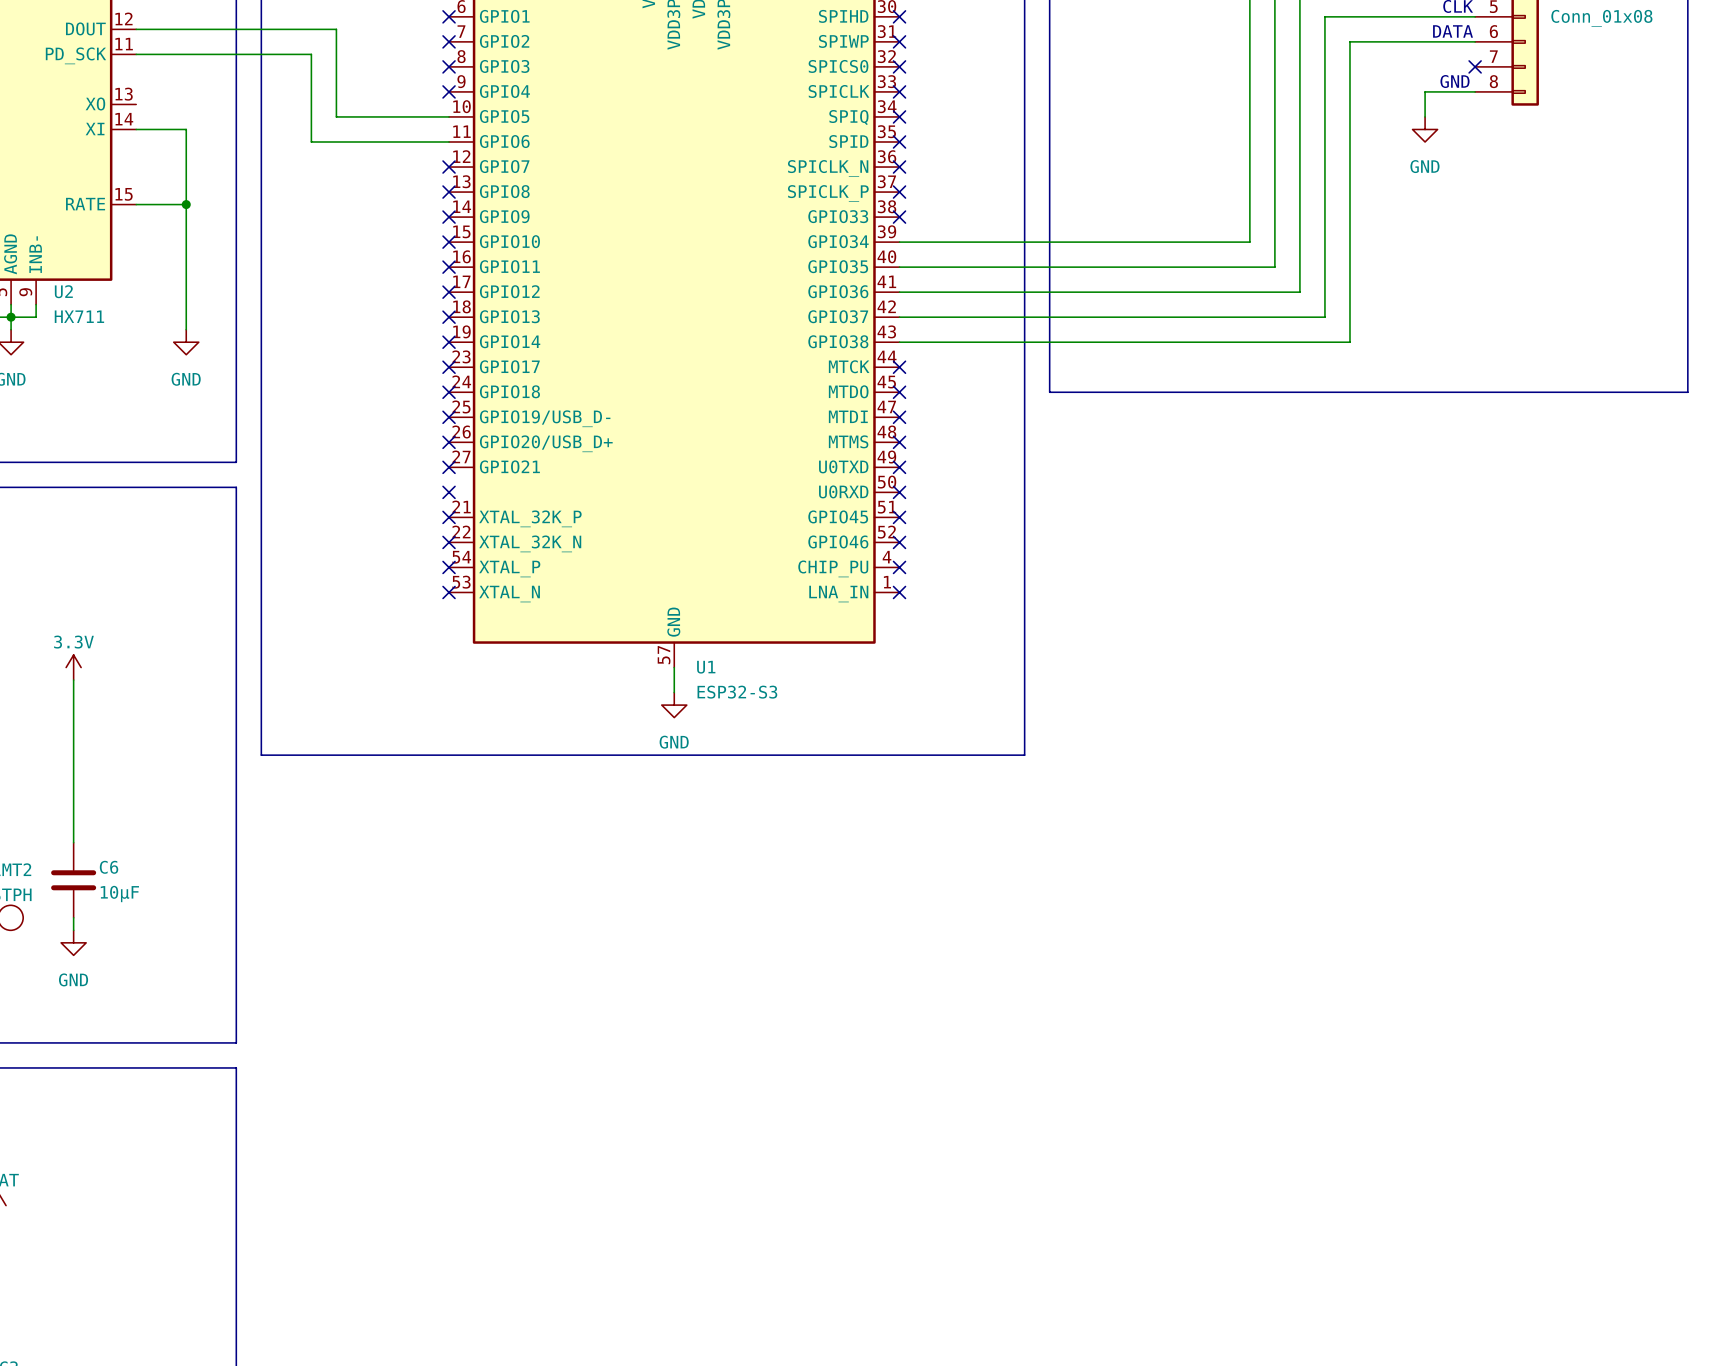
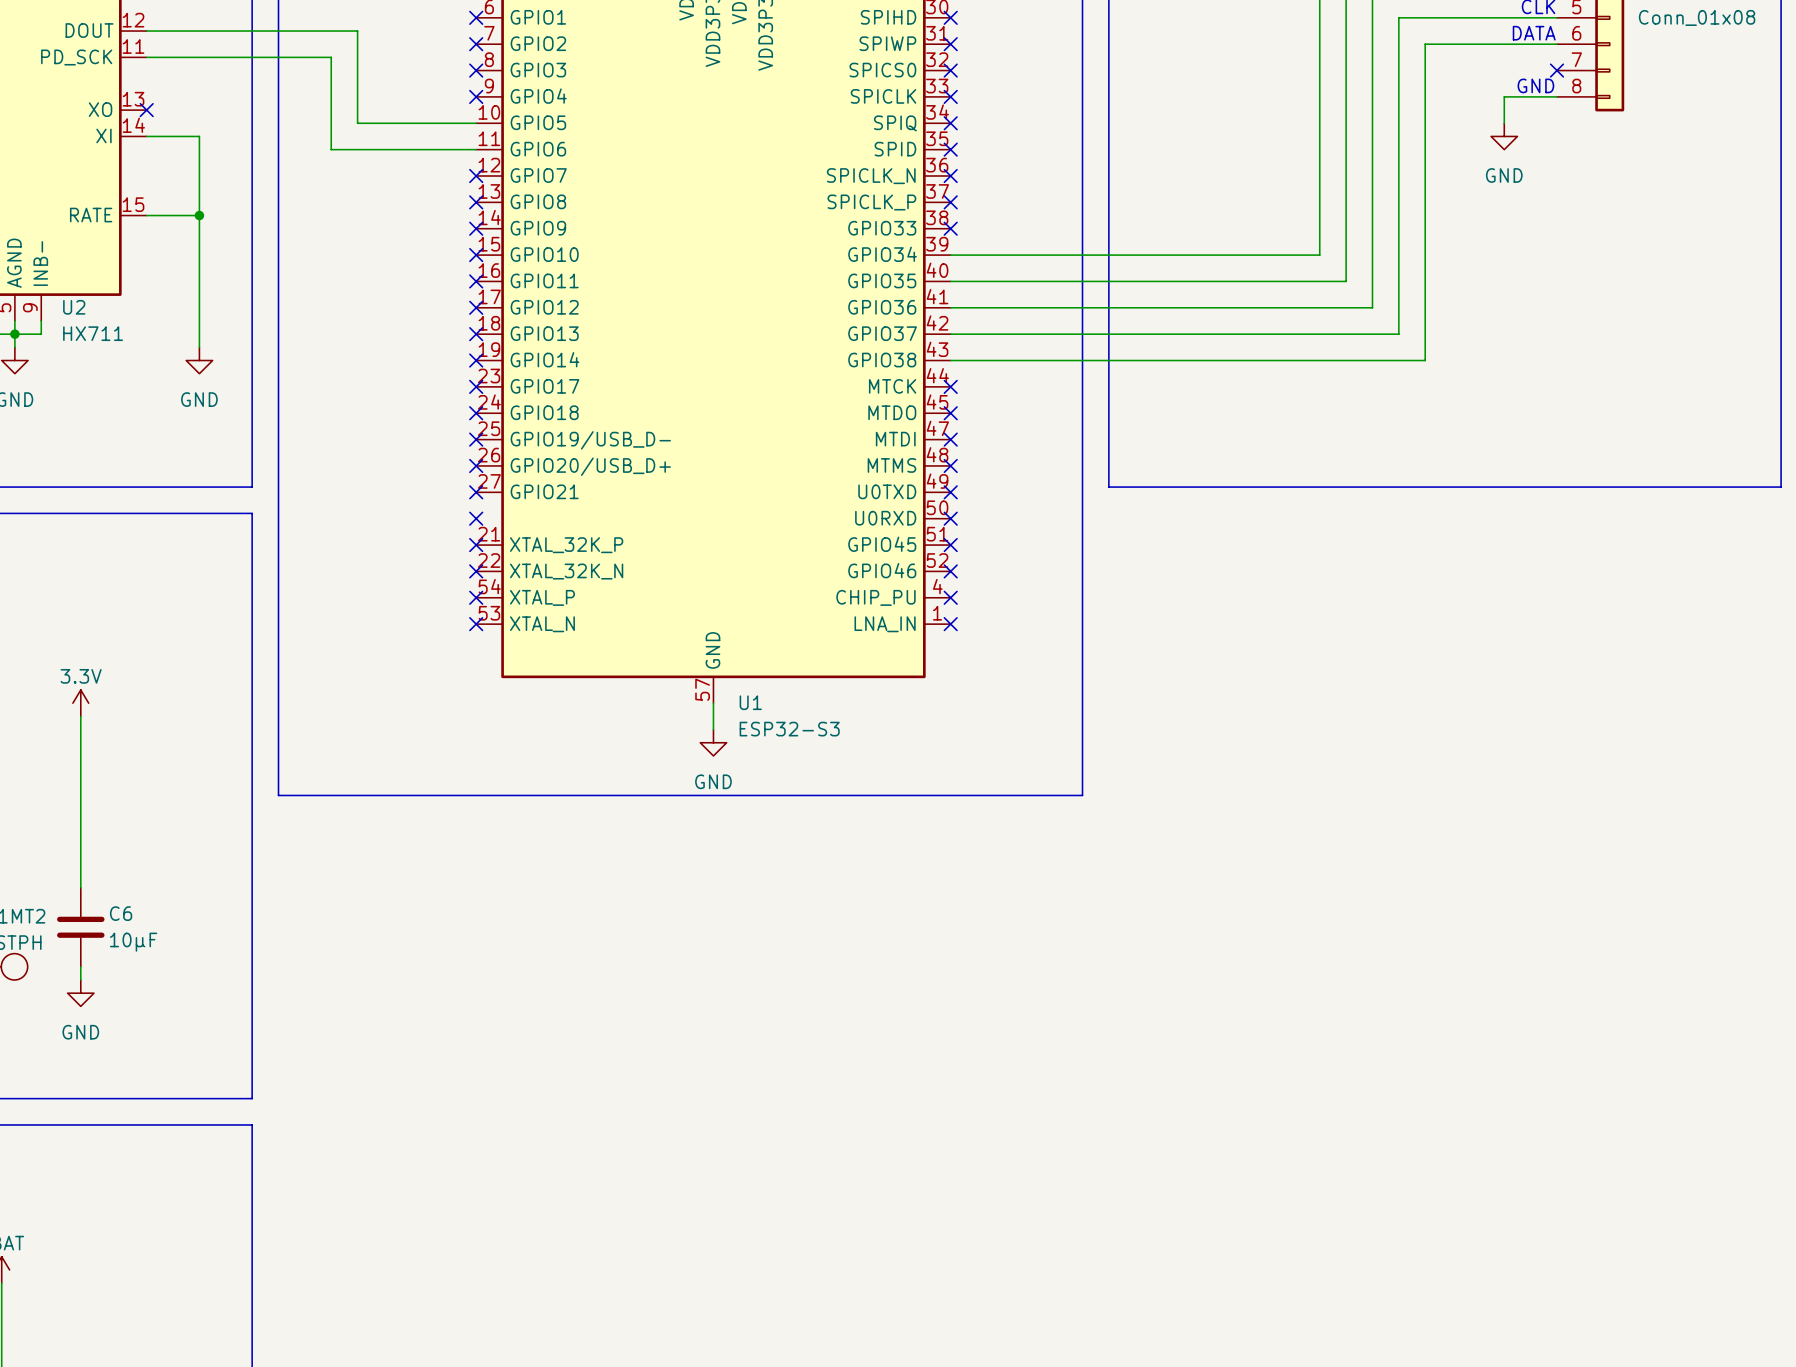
no-connect mark: none -> (146, 110)
line: (1049, 392) (1687, 392) -> (1108, 413) (1108, 487) (1781, 487) (1781, 413)

